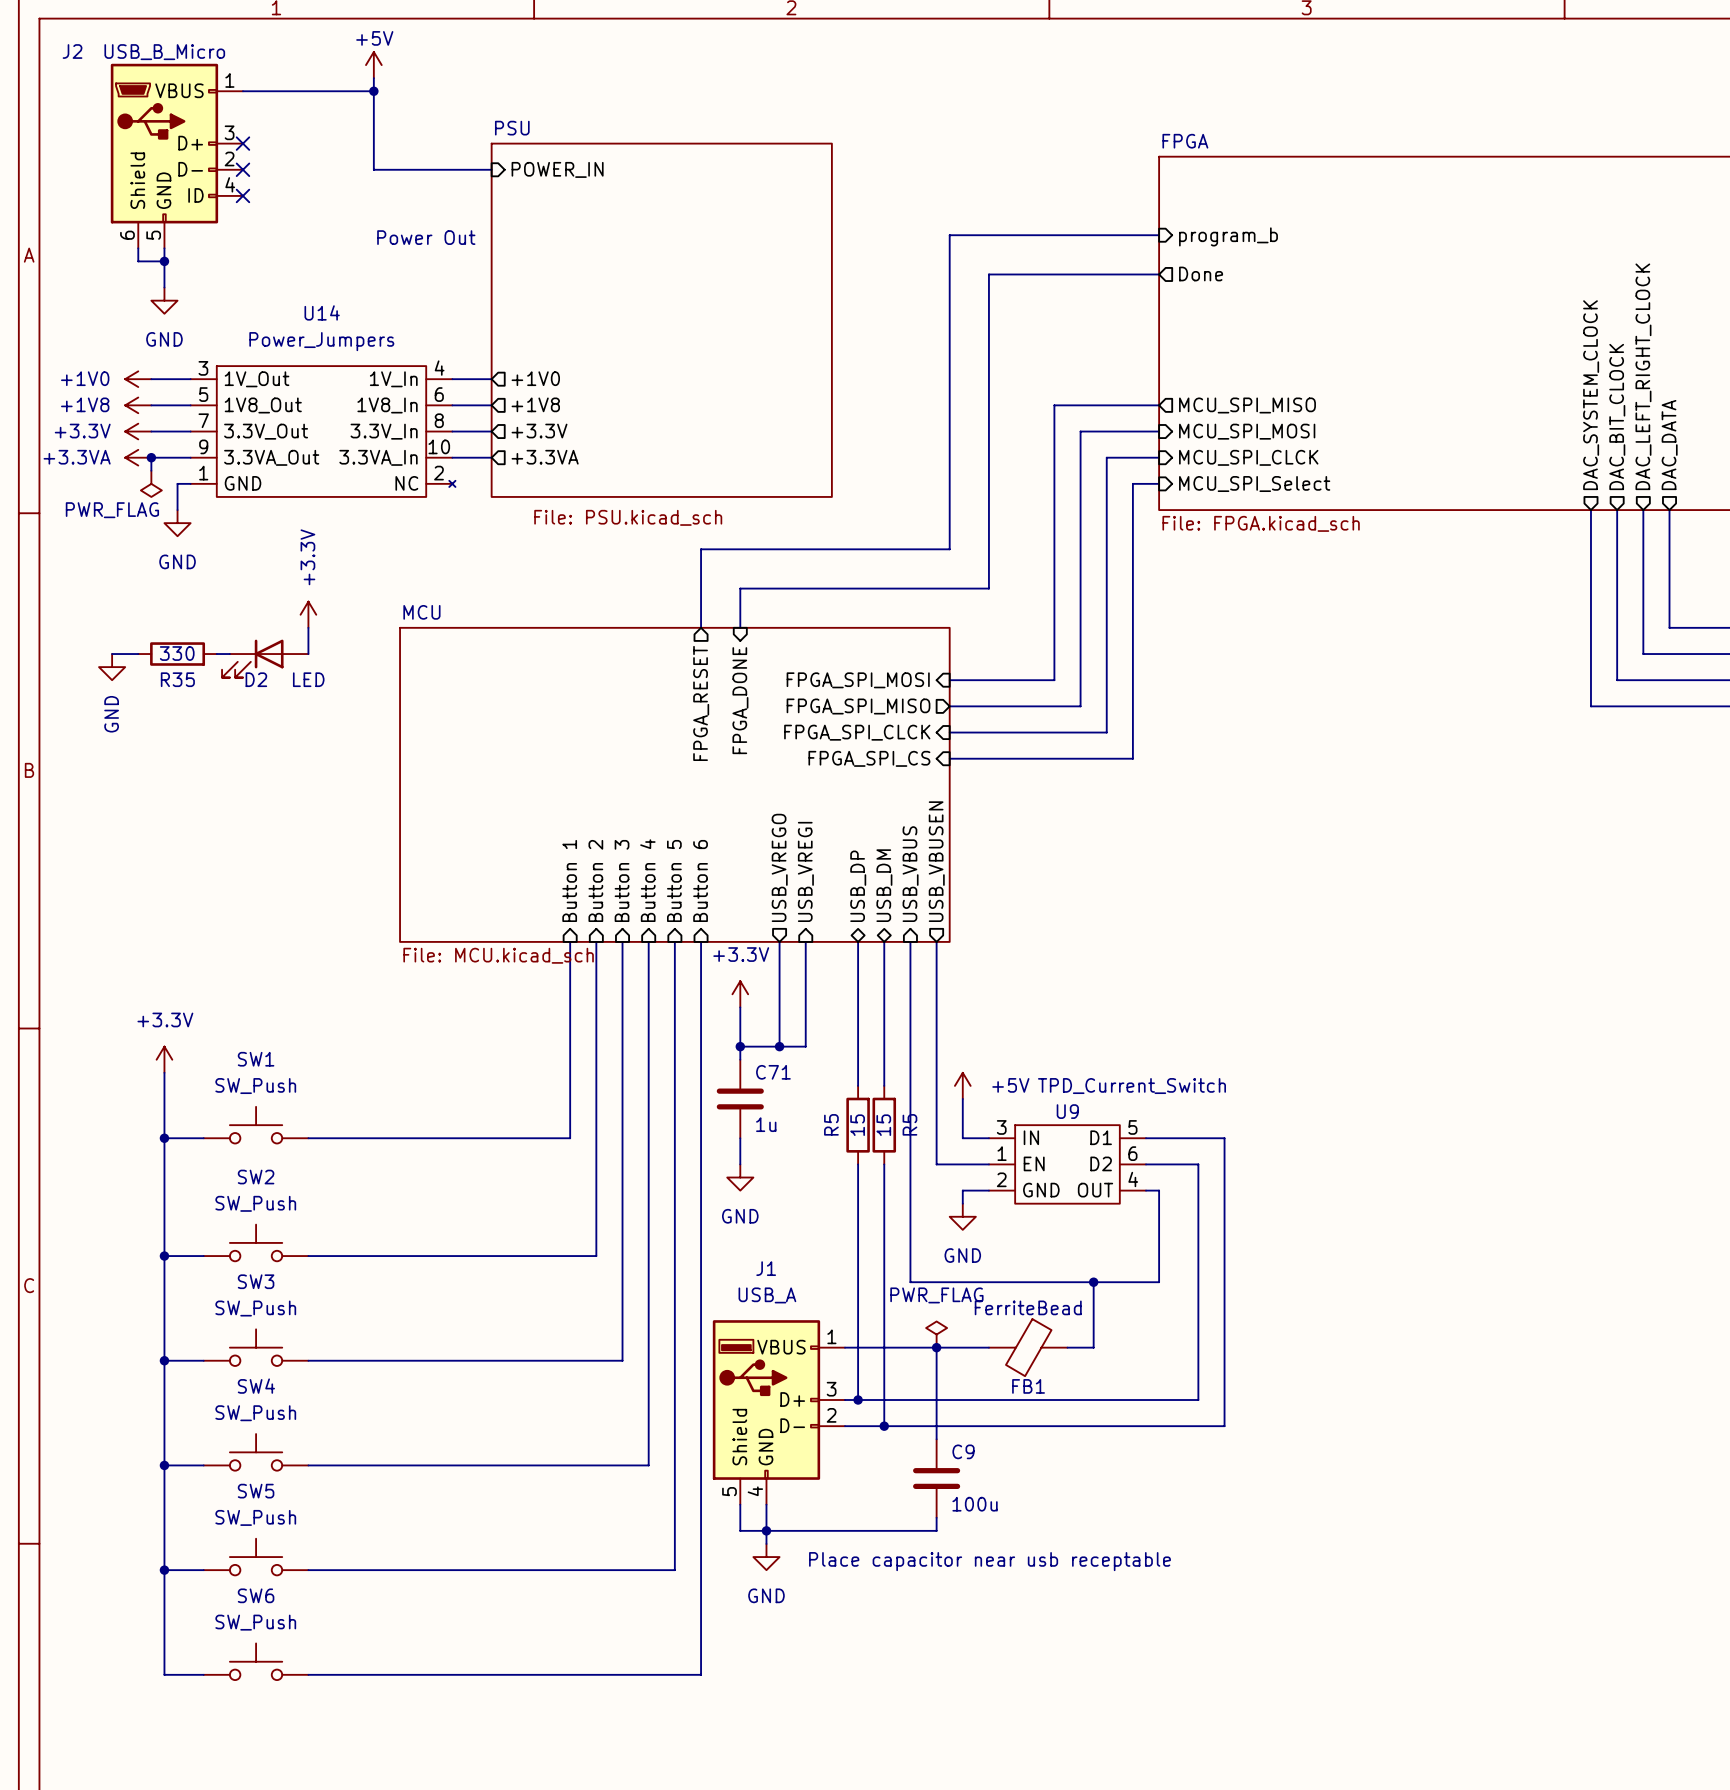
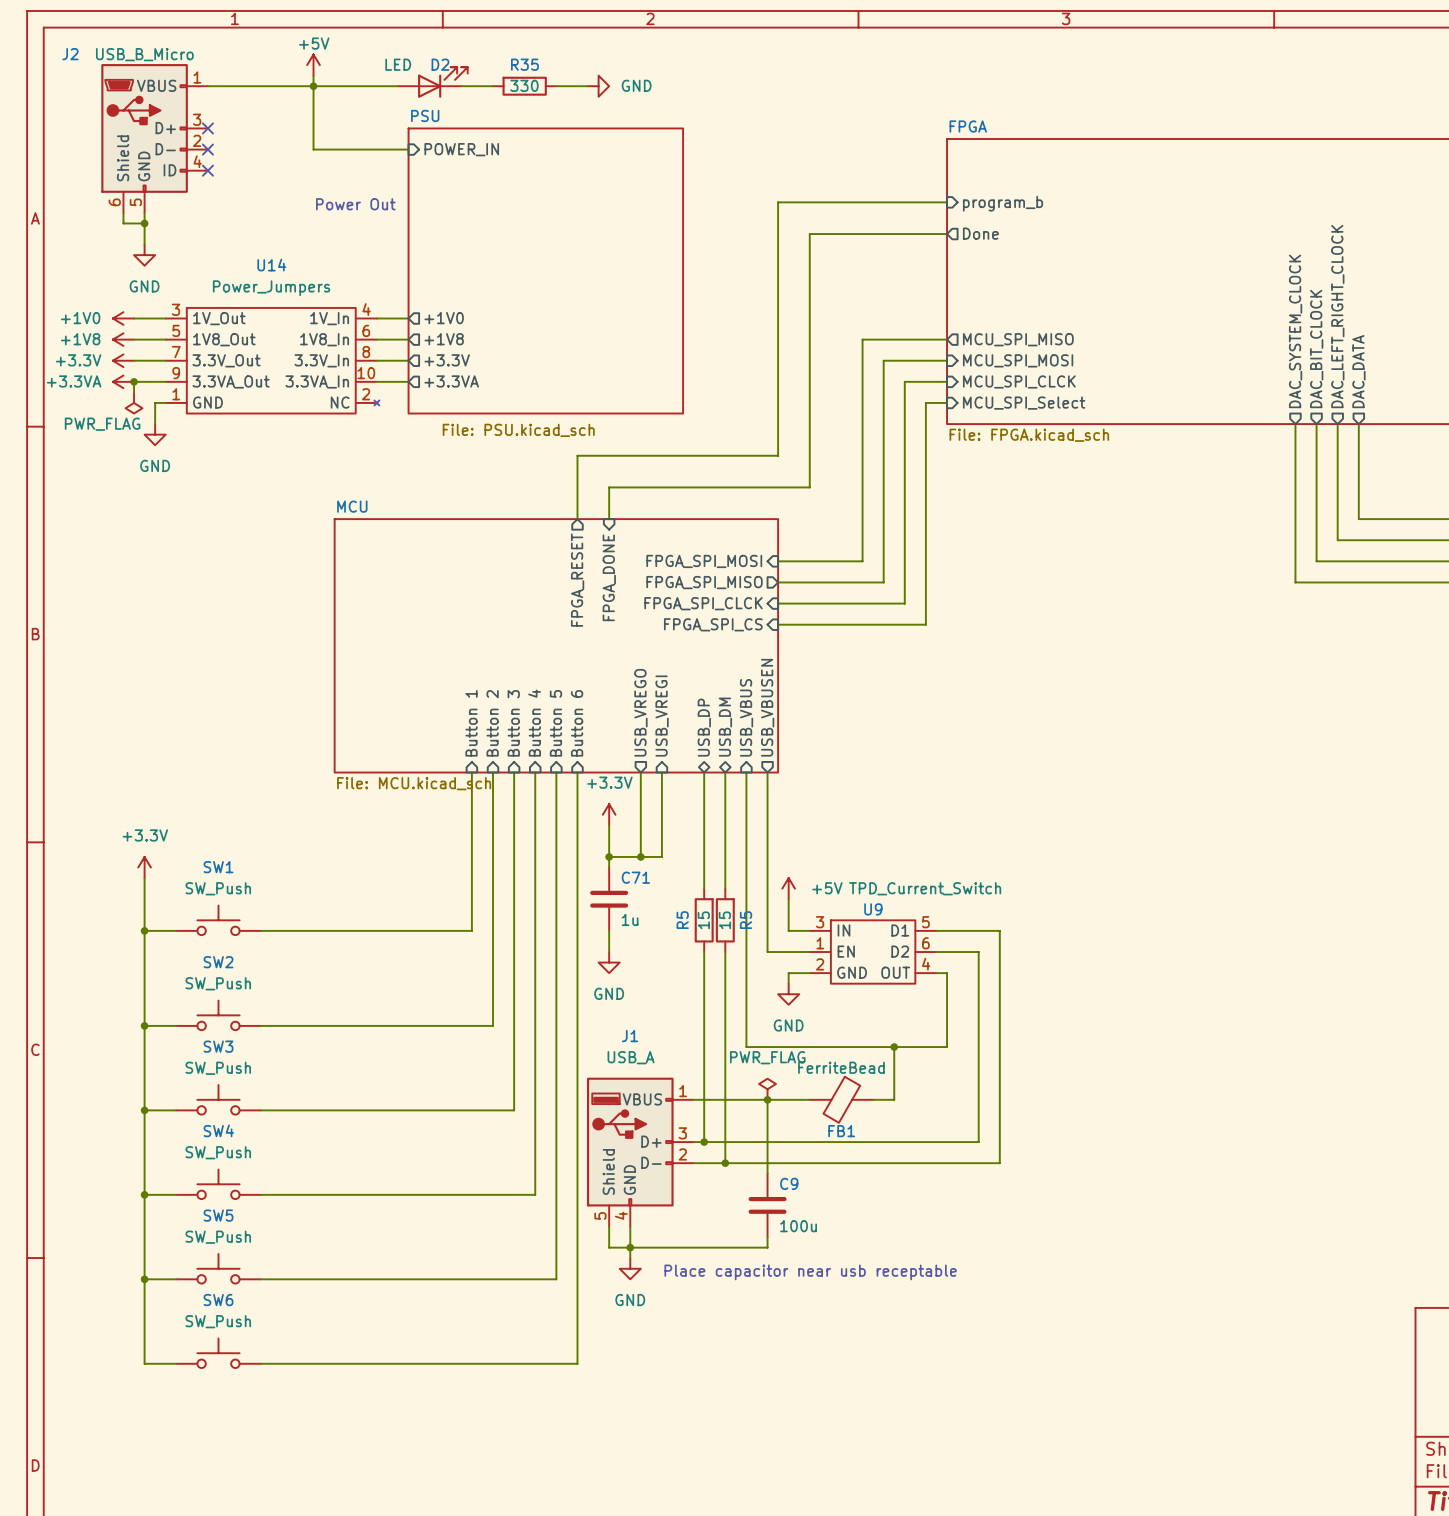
wire: none -> (313, 86) (397, 86)
wire: none -> (461, 86) (493, 86)
wire: none -> (556, 86) (588, 86)
power symbol: none -> GND (598, 86)
power symbol: +3.3V (308, 614) -> none
wire: (308, 627) (308, 654) -> none
wire: (112, 654) (138, 654) -> none
R35 position: (177, 654) -> (524, 86)
wire: (216, 654) (229, 654) -> none
D2 rotation: 0° (252, 658) -> 180° (442, 82)
D2 position: (265, 658) -> (432, 82)
power symbol: GND (112, 667) -> none
R35 name position: R35 (177, 679) -> R35 (524, 64)

